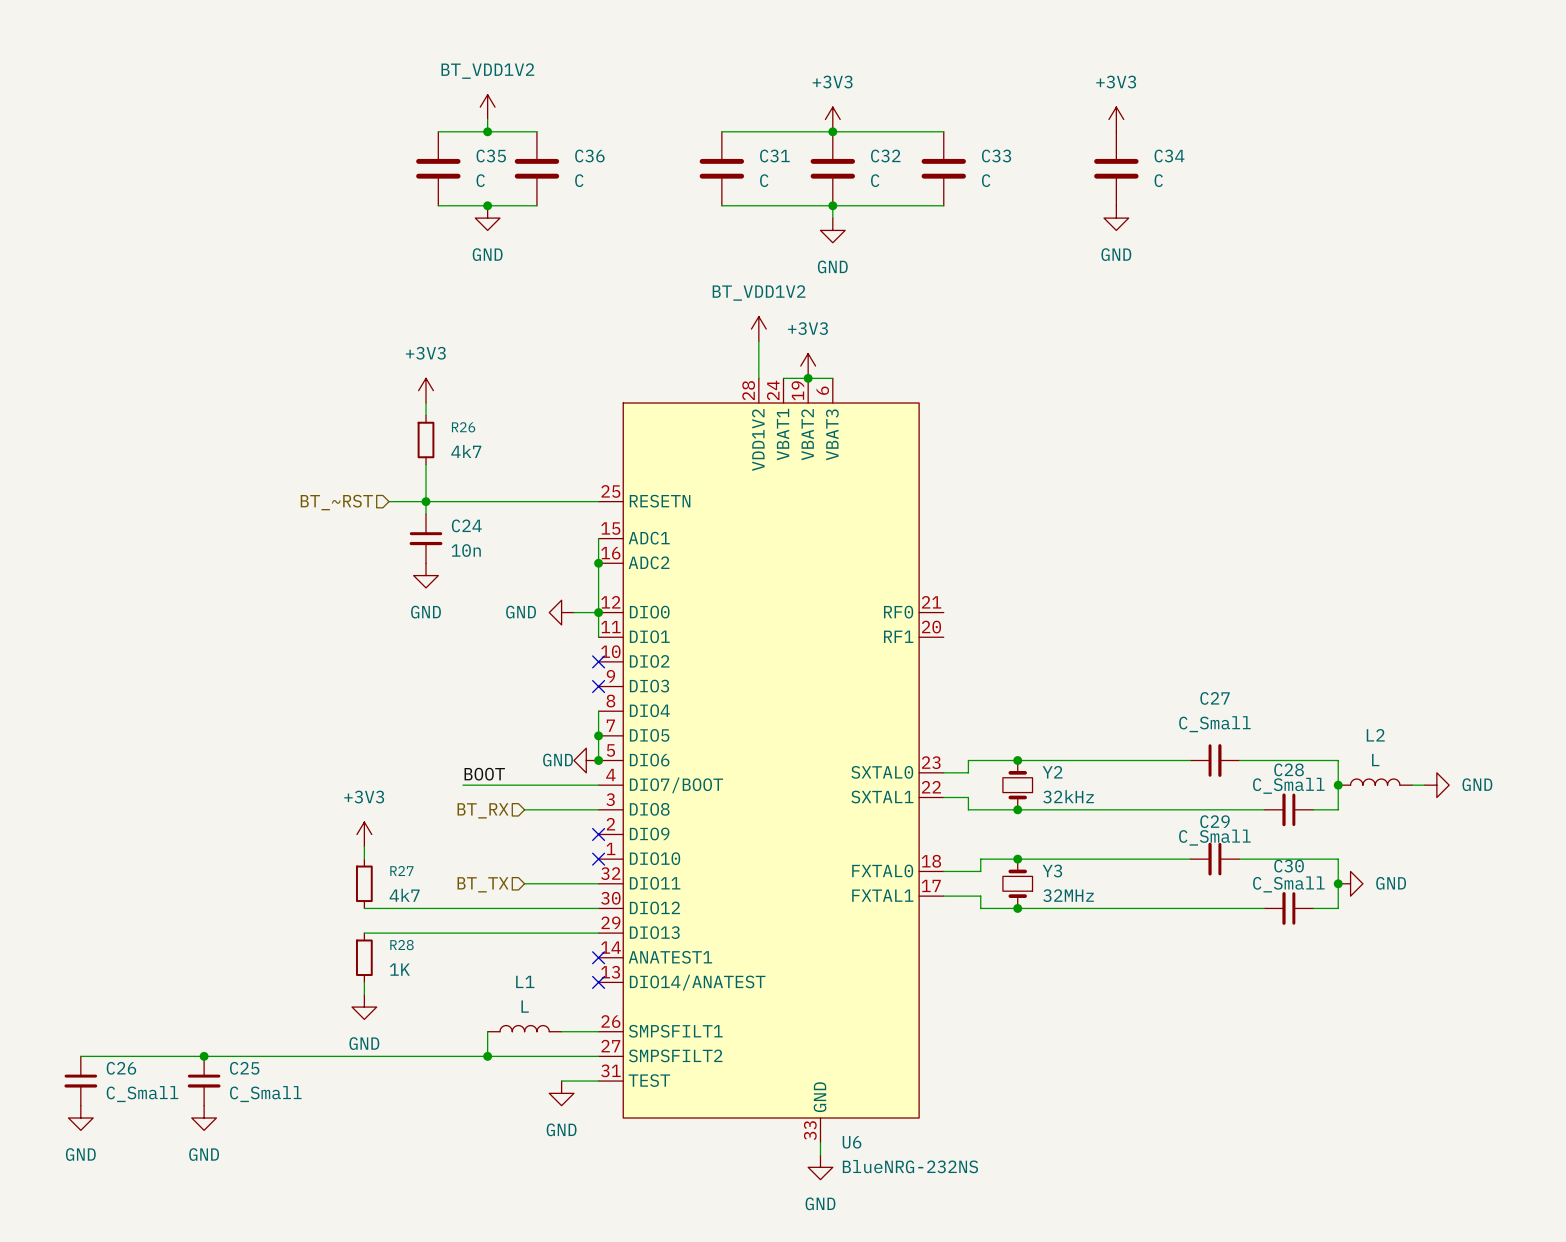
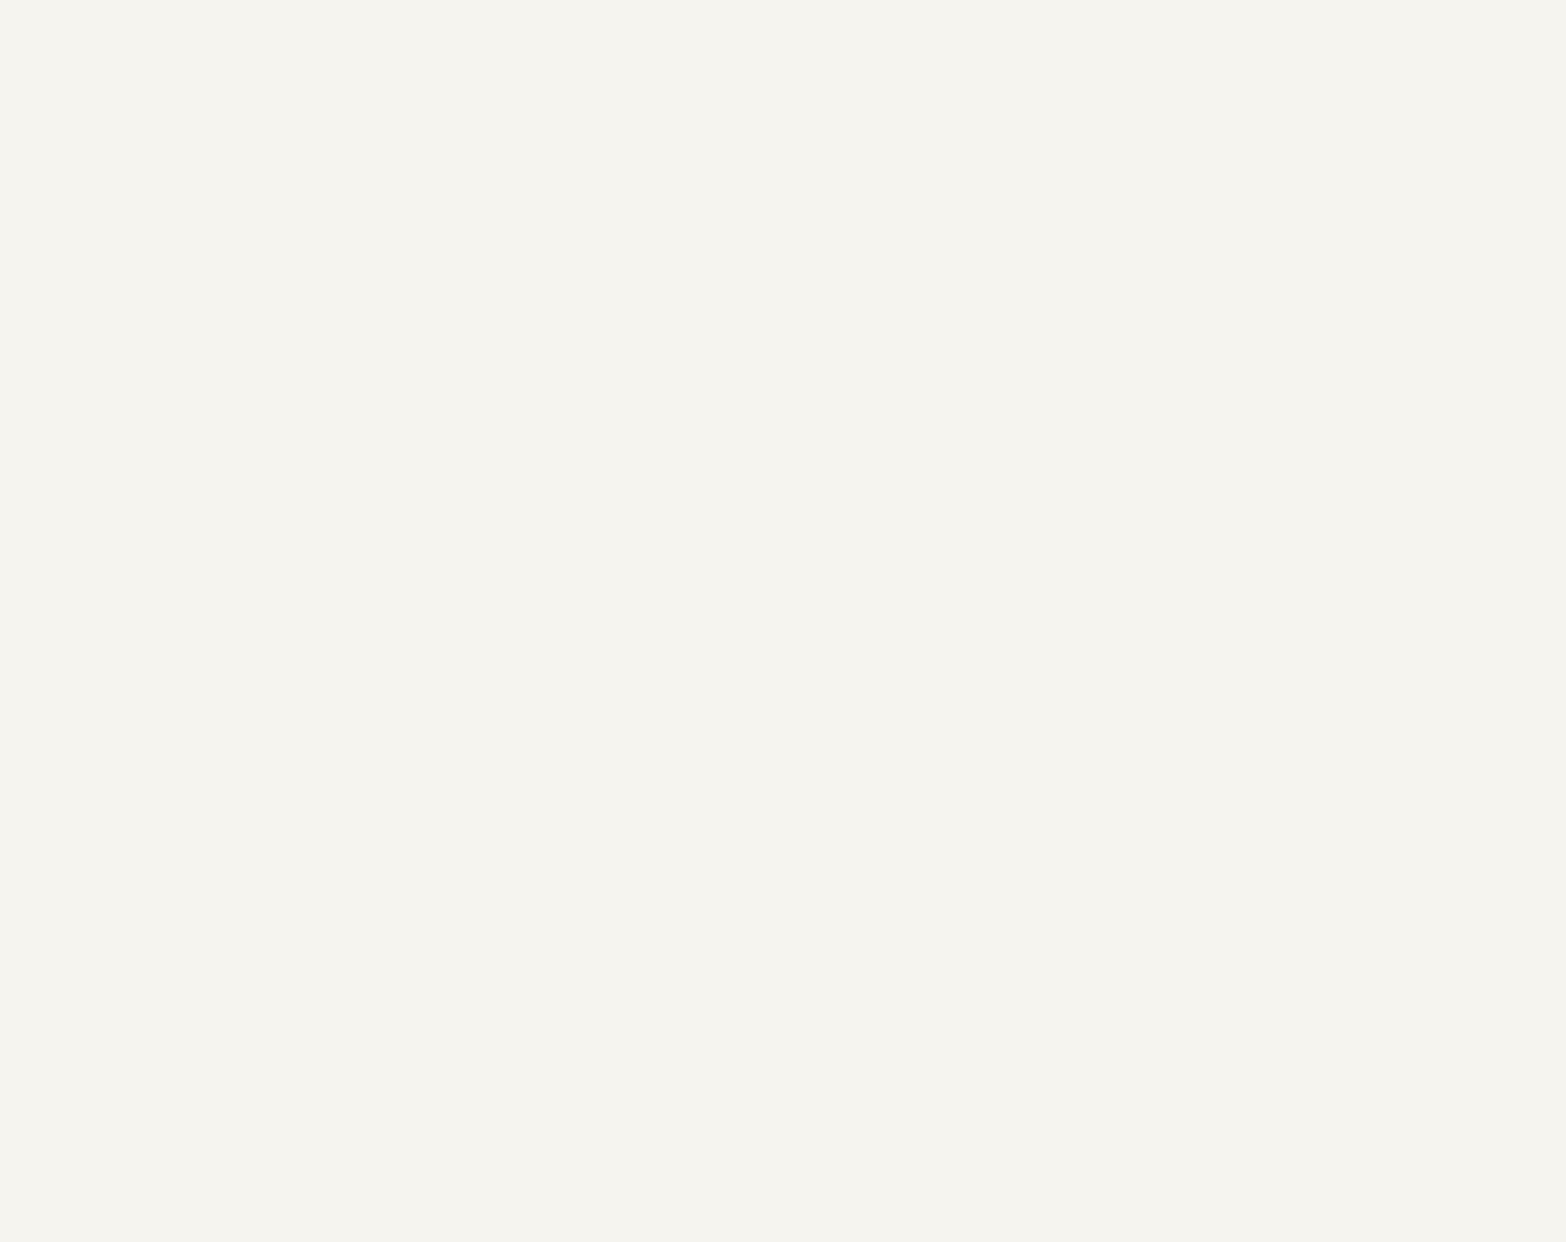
power symbol: BT_VDD1V2 (487, 107) -> none
wire: (487, 119) (487, 131) -> none
power symbol: +3V3 (832, 119) -> none
power symbol: +3V3 (1116, 119) -> none
wire: (438, 131) (536, 131) -> none
junction: (487, 131) -> none
wire: (721, 131) (943, 131) -> none
junction: (832, 131) -> none
C35: C (438, 168) -> none
C36: C (536, 168) -> none
C31: C (721, 168) -> none
C32: C (832, 168) -> none
C33: C (943, 168) -> none
C34: C (1116, 168) -> none
wire: (438, 205) (536, 205) -> none
junction: (487, 205) -> none
wire: (721, 205) (943, 205) -> none
wire: (832, 205) (832, 218) -> none
junction: (832, 205) -> none
power symbol: GND (487, 218) -> none
power symbol: GND (1116, 218) -> none
power symbol: GND (832, 230) -> none
power symbol: BT_VDD1V2 (758, 329) -> none
wire: (758, 341) (758, 378) -> none
power symbol: +3V3 (808, 366) -> none
wire: (783, 378) (832, 378) -> none
junction: (808, 378) -> none
power symbol: +3V3 (426, 390) -> none
wire: (426, 403) (426, 415) -> none
R26: 4k7 (426, 439) -> none
wire: (426, 464) (426, 513) -> none
wire: (389, 501) (598, 501) -> none
junction: (426, 501) -> none
hierarchical label: BT_~RST (336, 502) -> none
C24: 10n (426, 538) -> none
wire: (598, 538) (598, 637) -> none
junction: (598, 563) -> none
power symbol: GND (426, 575) -> none
power symbol: GND (561, 612) -> none
wire: (573, 612) (598, 612) -> none
junction: (598, 612) -> none
no-connect mark: (598, 661) -> none
no-connect mark: (598, 686) -> none
wire: (598, 711) (598, 760) -> none
junction: (598, 735) -> none
power symbol: GND (586, 760) -> none
junction: (598, 760) -> none
U6: BlueNRG-232NS (771, 760) -> none
junction: (1017, 760) -> none
wire: (1190, 760) (968, 760) (968, 772) (943, 772) -> none
C27: C_Small (1214, 760) -> none
wire: (1239, 760) (1338, 760) (1338, 809) (1313, 809) -> none
label: BOOT (484, 774) -> none
L2: L (1375, 782) -> none
wire: (462, 785) (598, 785) -> none
Y2: 32kHz (1017, 785) -> none
junction: (1338, 785) -> none
wire: (1412, 785) (1424, 785) -> none
power symbol: GND (1436, 785) -> none
wire: (943, 797) (968, 797) (968, 809) (1264, 809) -> none
wire: (524, 809) (598, 809) -> none
junction: (1017, 809) -> none
C28: C_Small (1288, 809) -> none
hierarchical label: BT_RX (483, 810) -> none
power symbol: +3V3 (364, 834) -> none
no-connect mark: (598, 834) -> none
wire: (364, 846) (364, 859) -> none
no-connect mark: (598, 859) -> none
junction: (1017, 859) -> none
wire: (1190, 859) (980, 859) (980, 871) (943, 871) -> none
C29: C_Small (1214, 859) -> none
wire: (1239, 859) (1338, 859) (1338, 908) (1313, 908) -> none
R27: 4k7 (364, 883) -> none
wire: (524, 883) (598, 883) -> none
Y3: 32MHz (1017, 883) -> none
junction: (1338, 883) -> none
power symbol: GND (1350, 883) -> none
hierarchical label: BT_TX (483, 884) -> none
wire: (943, 896) (980, 896) (980, 908) (1264, 908) -> none
wire: (364, 908) (598, 908) -> none
junction: (1017, 908) -> none
C30: C_Small (1288, 908) -> none
wire: (364, 933) (598, 933) -> none
R28: 1K (364, 957) -> none
no-connect mark: (598, 957) -> none
wire: (364, 982) (364, 994) -> none
no-connect mark: (598, 982) -> none
power symbol: GND (364, 1007) -> none
L1: L (524, 1028) -> none
wire: (487, 1031) (487, 1056) -> none
wire: (561, 1031) (598, 1031) -> none
wire: (80, 1056) (598, 1056) -> none
junction: (204, 1056) -> none
junction: (487, 1056) -> none
C26: C_Small (80, 1081) -> none
C25: C_Small (204, 1081) -> none
wire: (561, 1081) (598, 1081) -> none
power symbol: GND (561, 1093) -> none
power symbol: GND (80, 1118) -> none
power symbol: GND (204, 1118) -> none
wire: (820, 1142) (820, 1154) -> none
power symbol: GND (820, 1167) -> none

